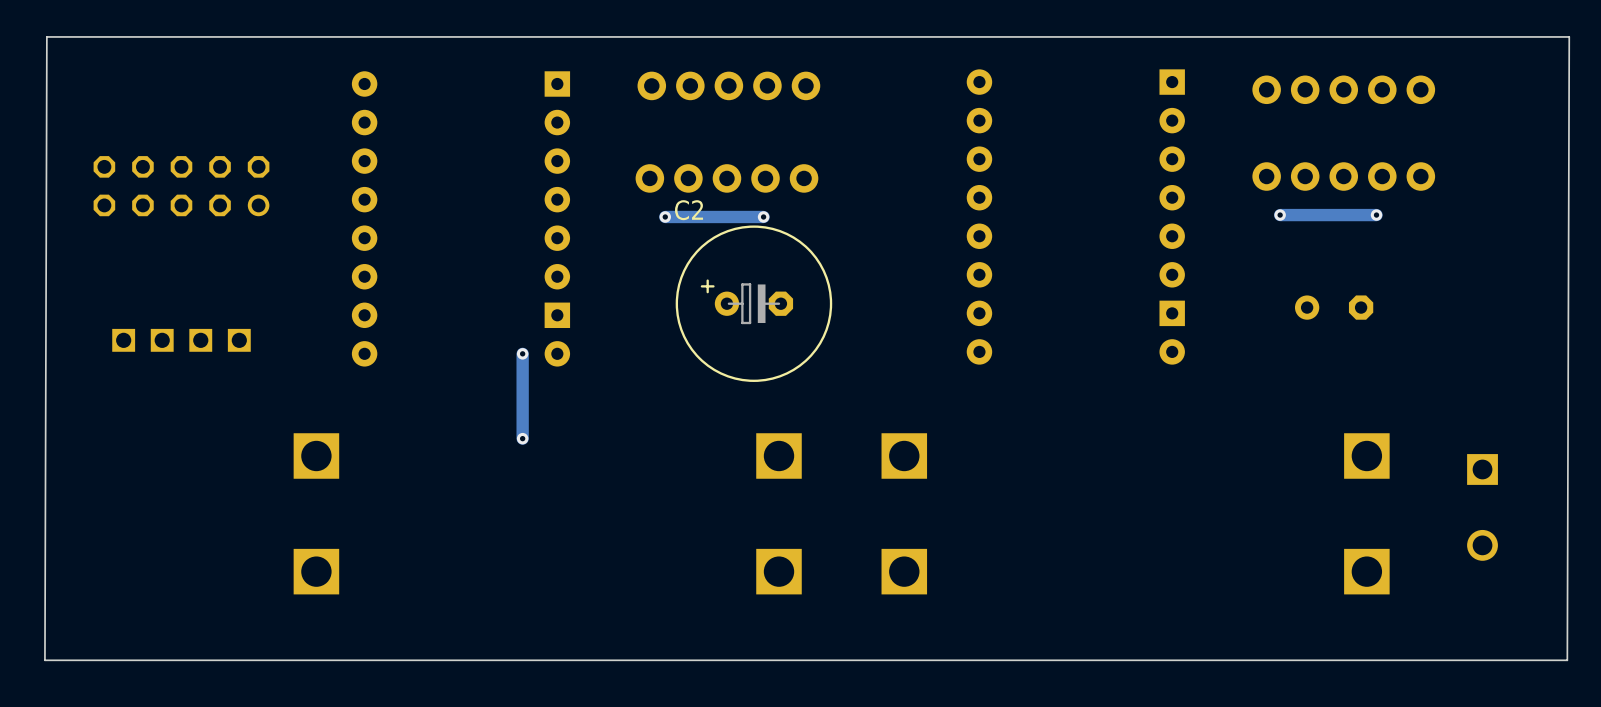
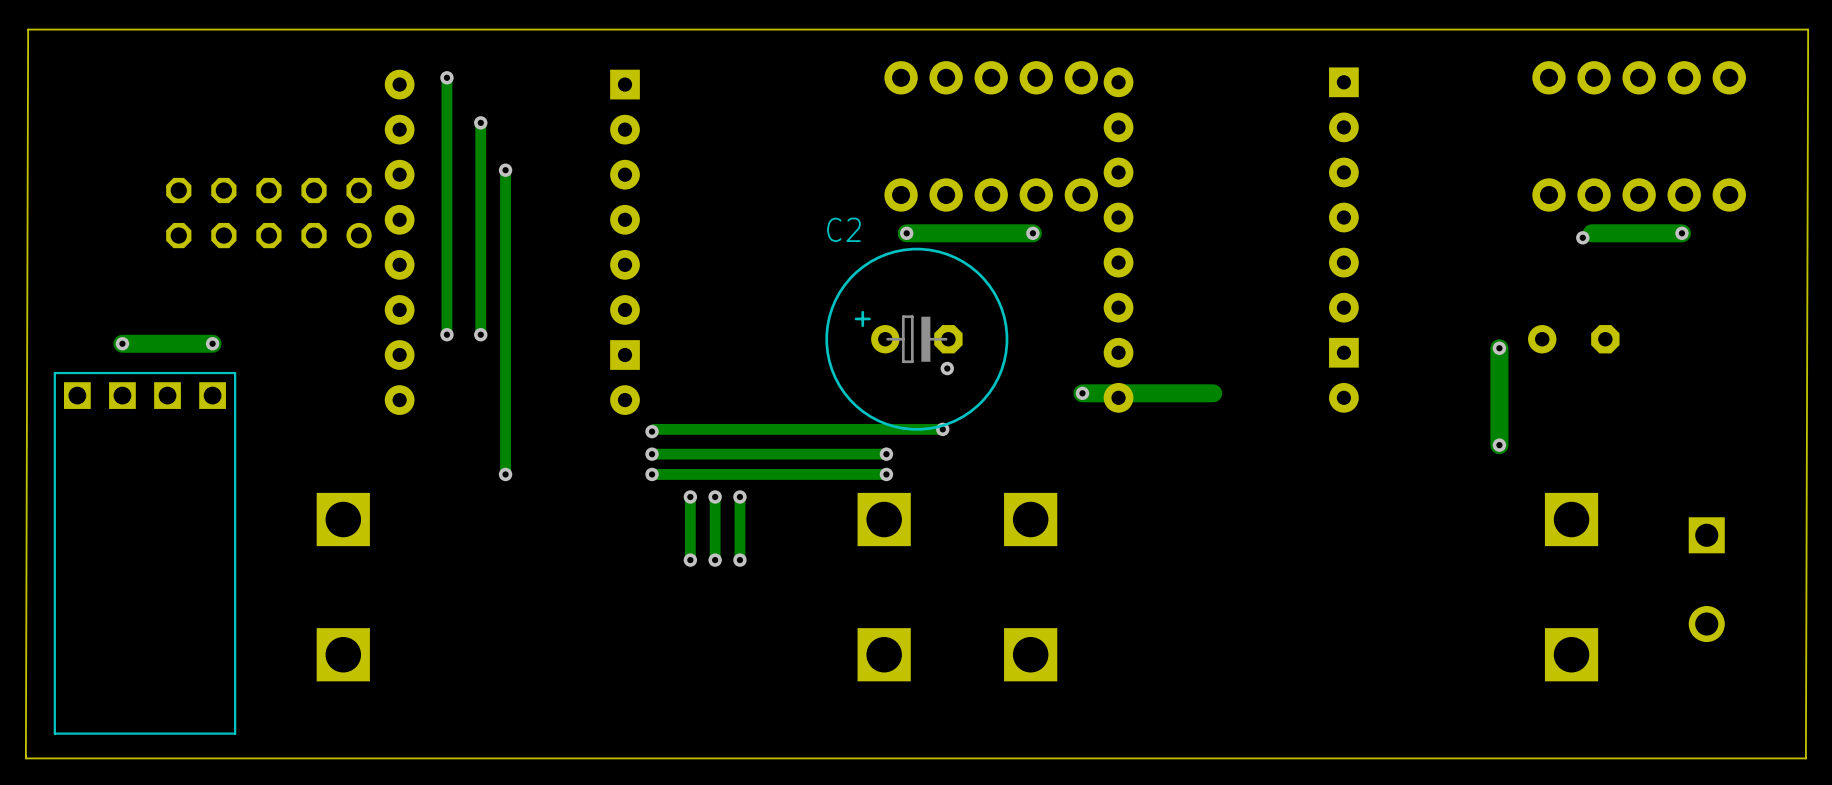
track: none -> (446, 77) (446, 334)
via: none -> (446, 77)
part: none -> (991, 77)
part: none -> (1639, 77)
part: (728, 85) -> none
part: (1343, 89) -> none
track: none -> (480, 122) (480, 334)
via: none -> (480, 122)
track: none -> (505, 170) (505, 474)
via: none -> (505, 170)
part: (1343, 176) -> none
part: (726, 178) -> none
part: none -> (991, 194)
part: none -> (1639, 194)
part position: (181, 186) -> (268, 213)
track: none -> (1032, 233) (906, 233)
via: none -> (1032, 233)
track: none -> (1681, 233) (1591, 233)
via: none -> (1681, 233)
via: (1280, 215) -> none
track: (1376, 215) (1280, 215) -> none
via: (665, 216) -> none
track: (763, 216) (665, 216) -> none
via position: (763, 216) -> (906, 233)
via: none -> (446, 334)
via: none -> (480, 334)
C2 position: (753, 303) -> (916, 339)
via: none -> (122, 343)
track: none -> (212, 343) (122, 343)
via: none -> (212, 343)
part position: (1334, 307) -> (1573, 339)
track: none -> (1499, 348) (1499, 445)
via: none -> (1499, 348)
via: none -> (947, 368)
part side: top (181, 340) -> bottom (144, 553)
via: none -> (1082, 393)
track: none -> (1213, 393) (1082, 393)
track: (522, 353) (522, 438) -> none
via: (522, 353) -> none
track: none -> (942, 429) (654, 429) (652, 431)
via: none -> (942, 429)
via: none -> (652, 431)
via: none -> (1499, 445)
via: none -> (652, 454)
track: none -> (886, 454) (652, 454)
via: none -> (886, 454)
via: none -> (505, 474)
via: none -> (652, 474)
track: none -> (886, 474) (652, 474)
via: none -> (886, 474)
track: none -> (690, 496) (690, 560)
via: none -> (690, 496)
track: none -> (715, 496) (715, 560)
via: none -> (715, 496)
track: none -> (739, 496) (739, 560)
via: none -> (739, 496)
via: (522, 438) -> none
via: none -> (690, 560)
via: none -> (715, 560)
via: none -> (739, 560)

